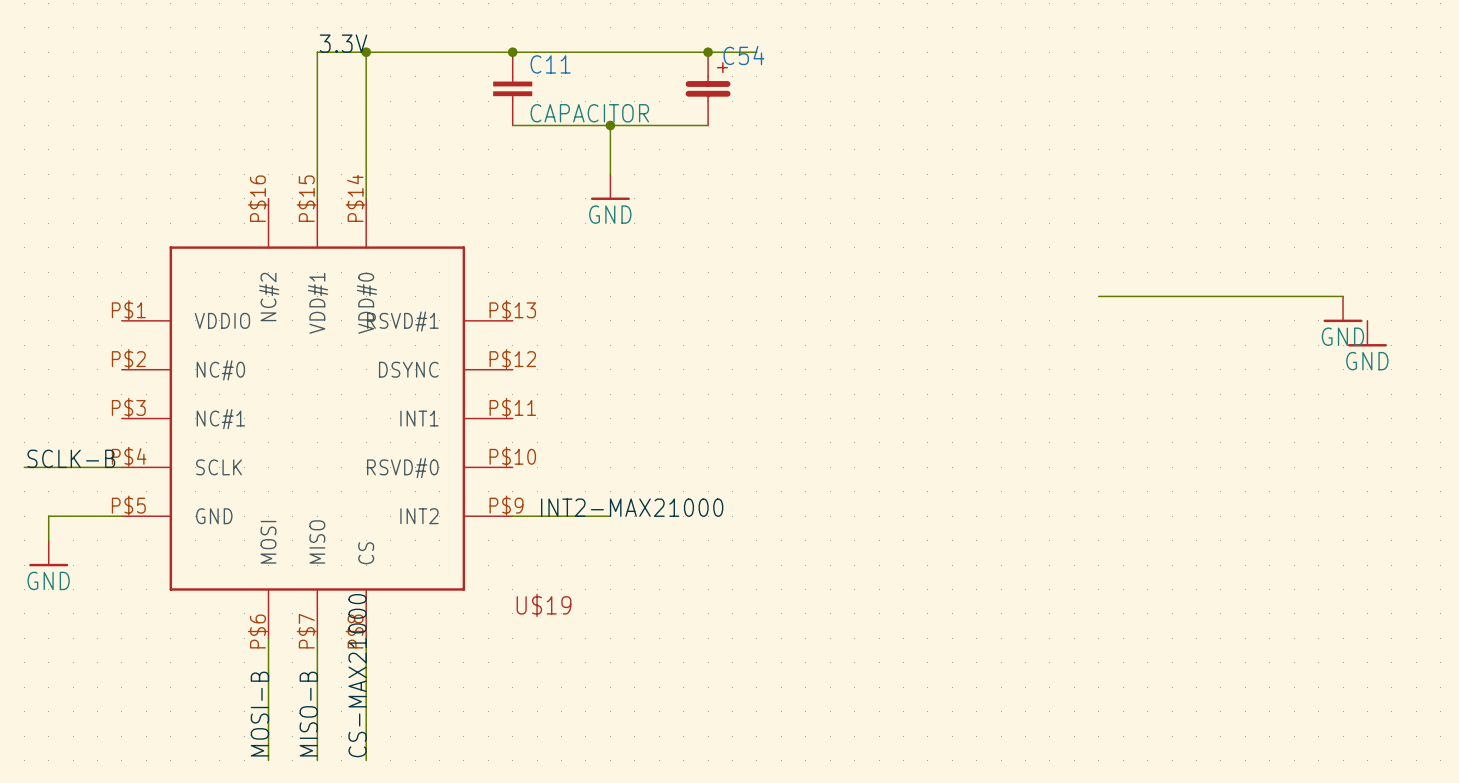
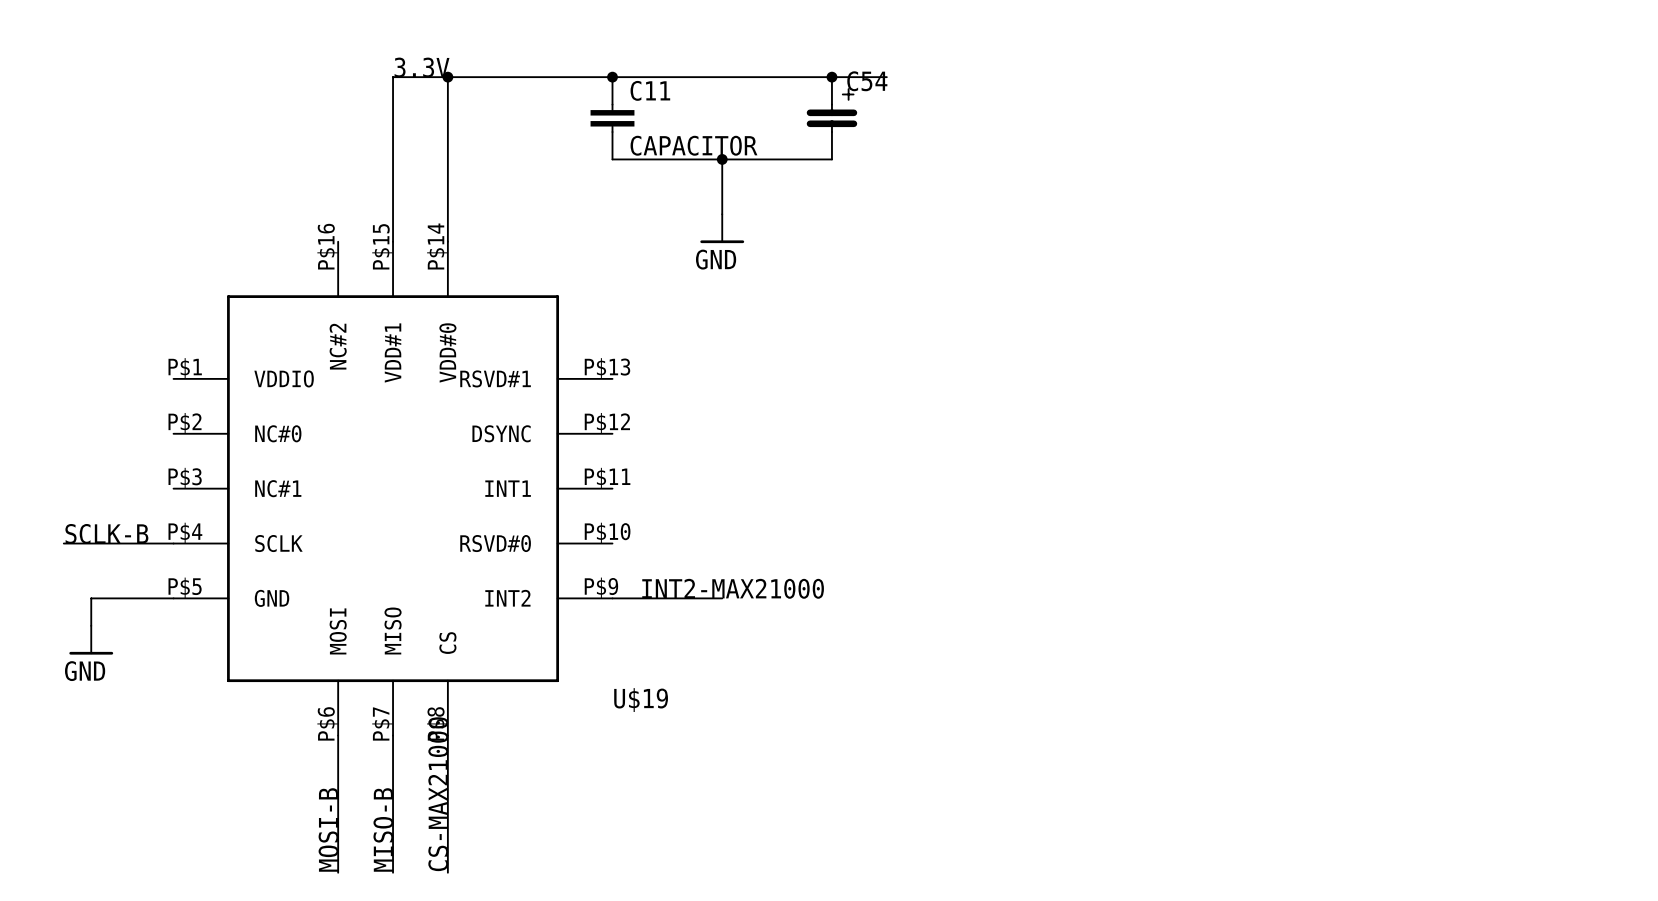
wire: (1098, 296) (1343, 296) -> none
power symbol: GND (1343, 309) -> none
power symbol: GND (1367, 333) -> none

